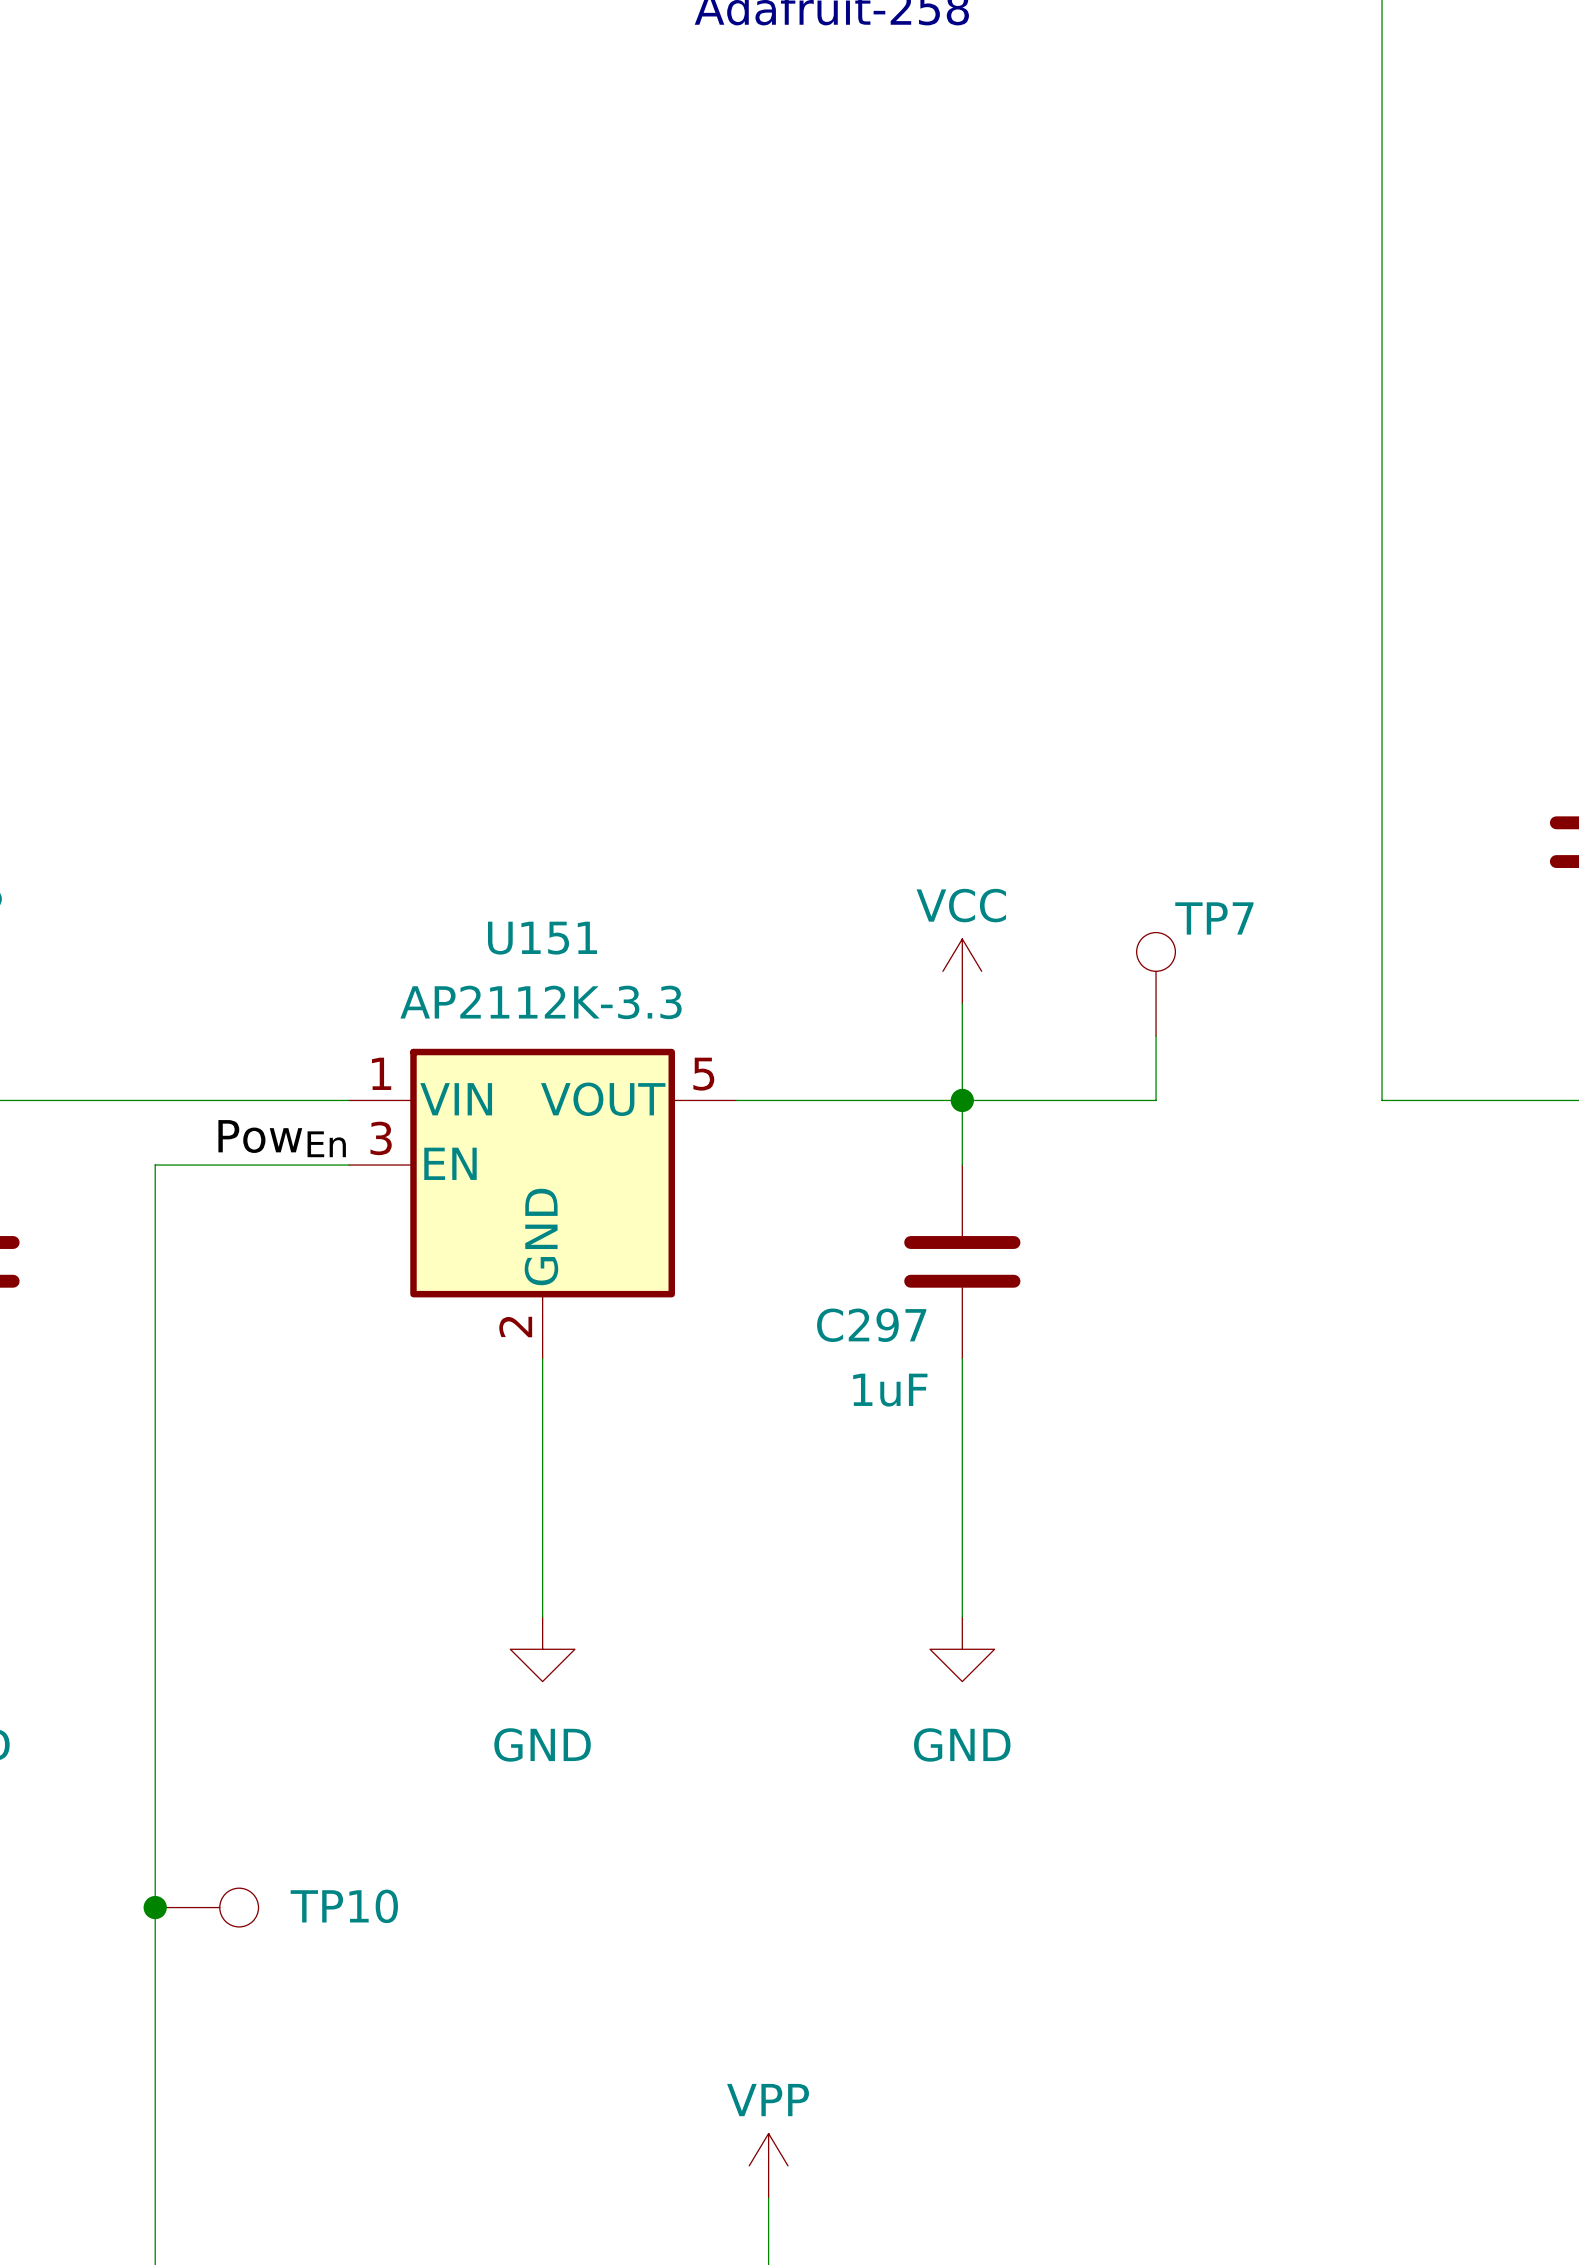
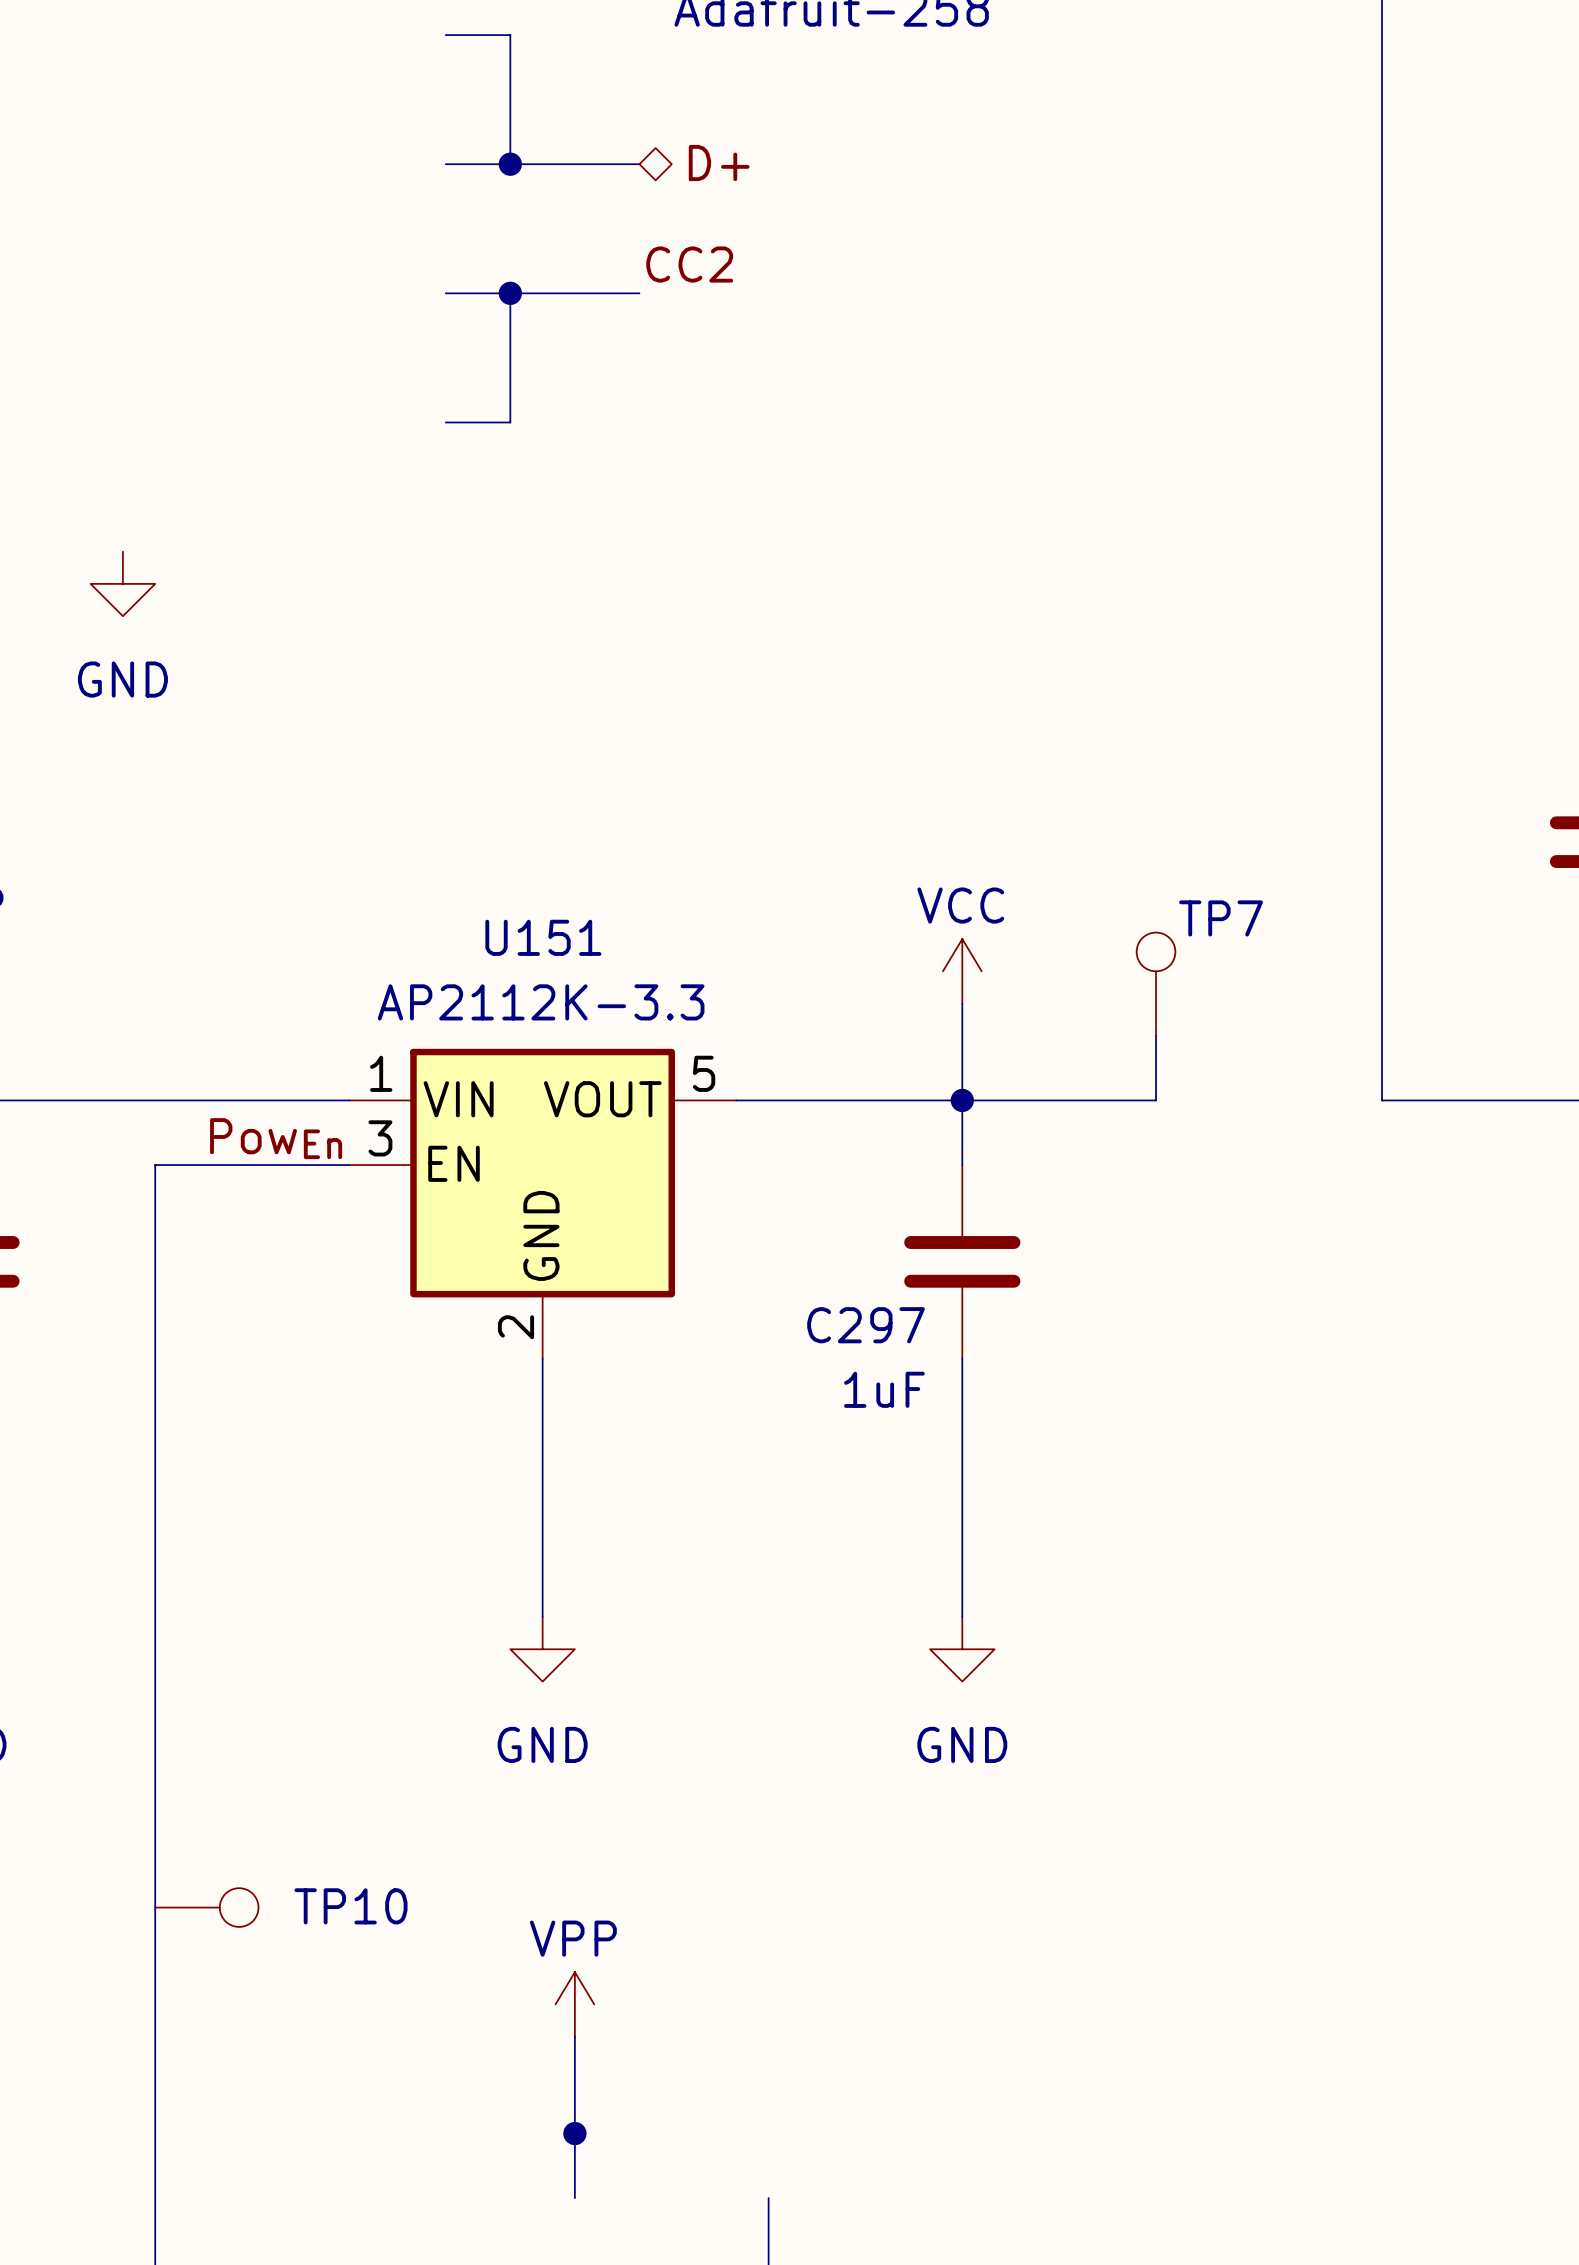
wire: none -> (445, 35) (510, 35) (510, 164)
hierarchical label: none -> D+ (719, 163)
wire: none -> (445, 164) (639, 164)
junction: none -> (510, 164)
label: none -> CC2 (689, 264)
wire: none -> (445, 293) (639, 293)
wire: none -> (510, 293) (510, 422) (445, 422)
junction: none -> (510, 293)
power symbol: none -> GND (122, 583)
junction: (155, 1907) -> none
wire: none -> (574, 2036) (574, 2198)
junction: none -> (574, 2133)
power symbol position: VPP (768, 2165) -> VPP (574, 2004)

